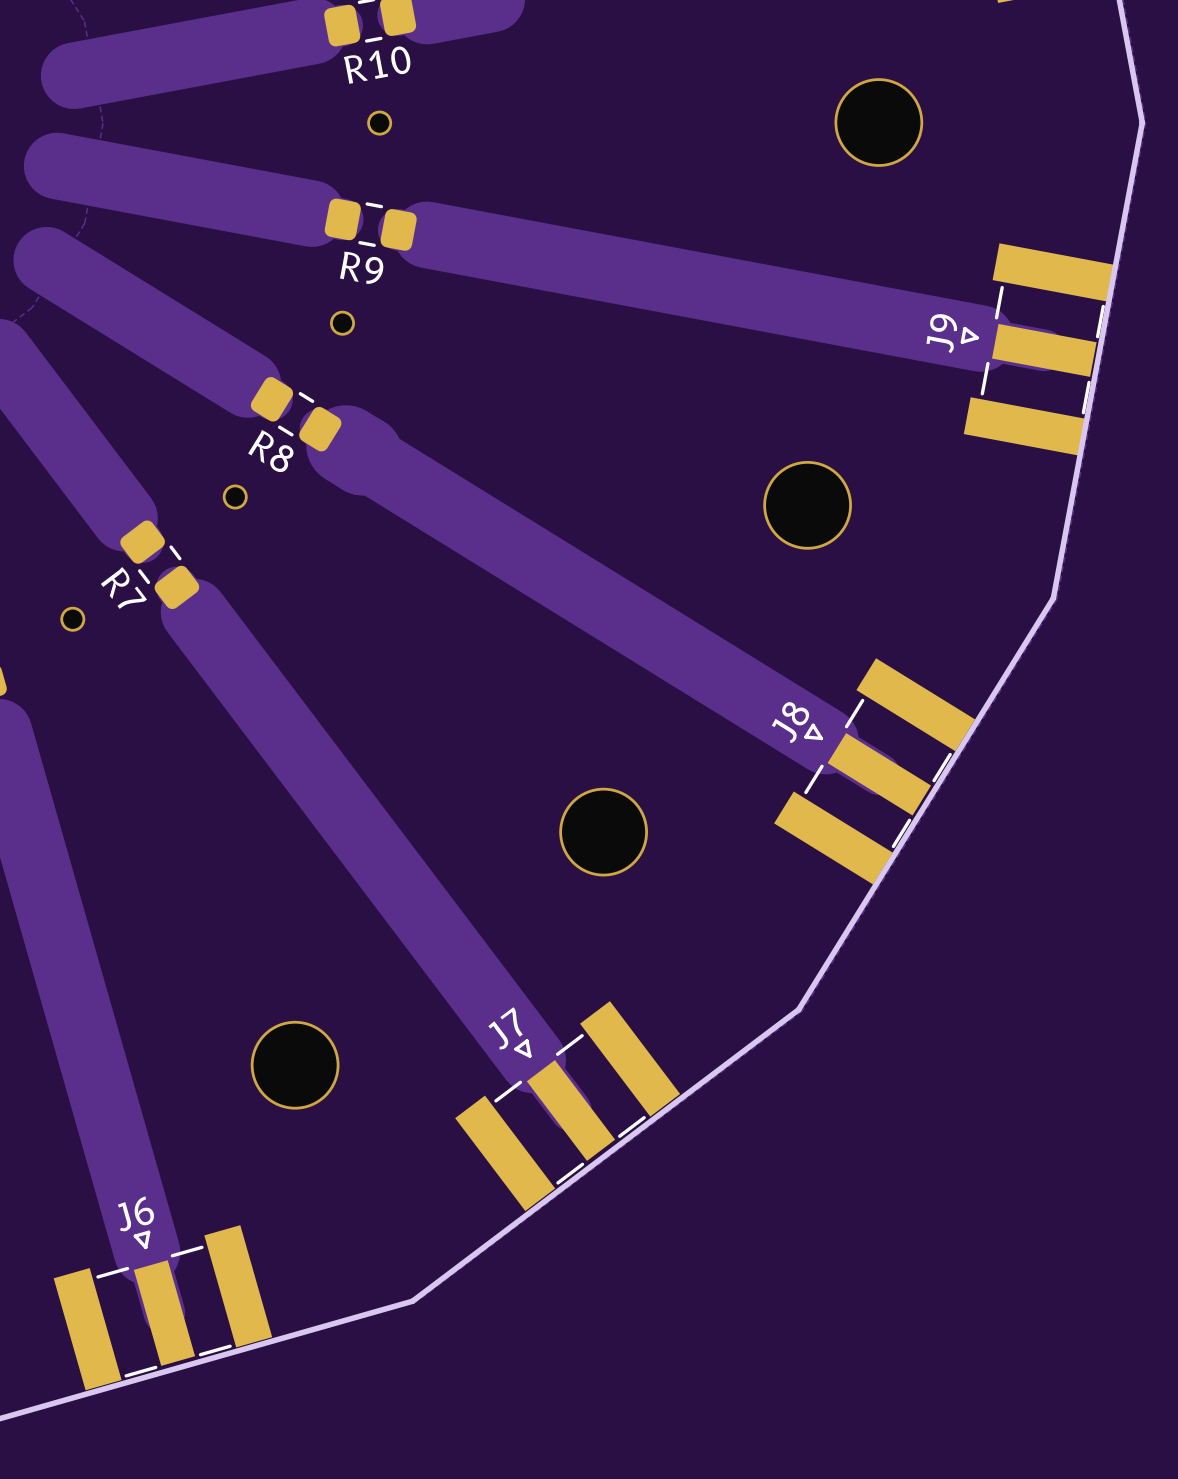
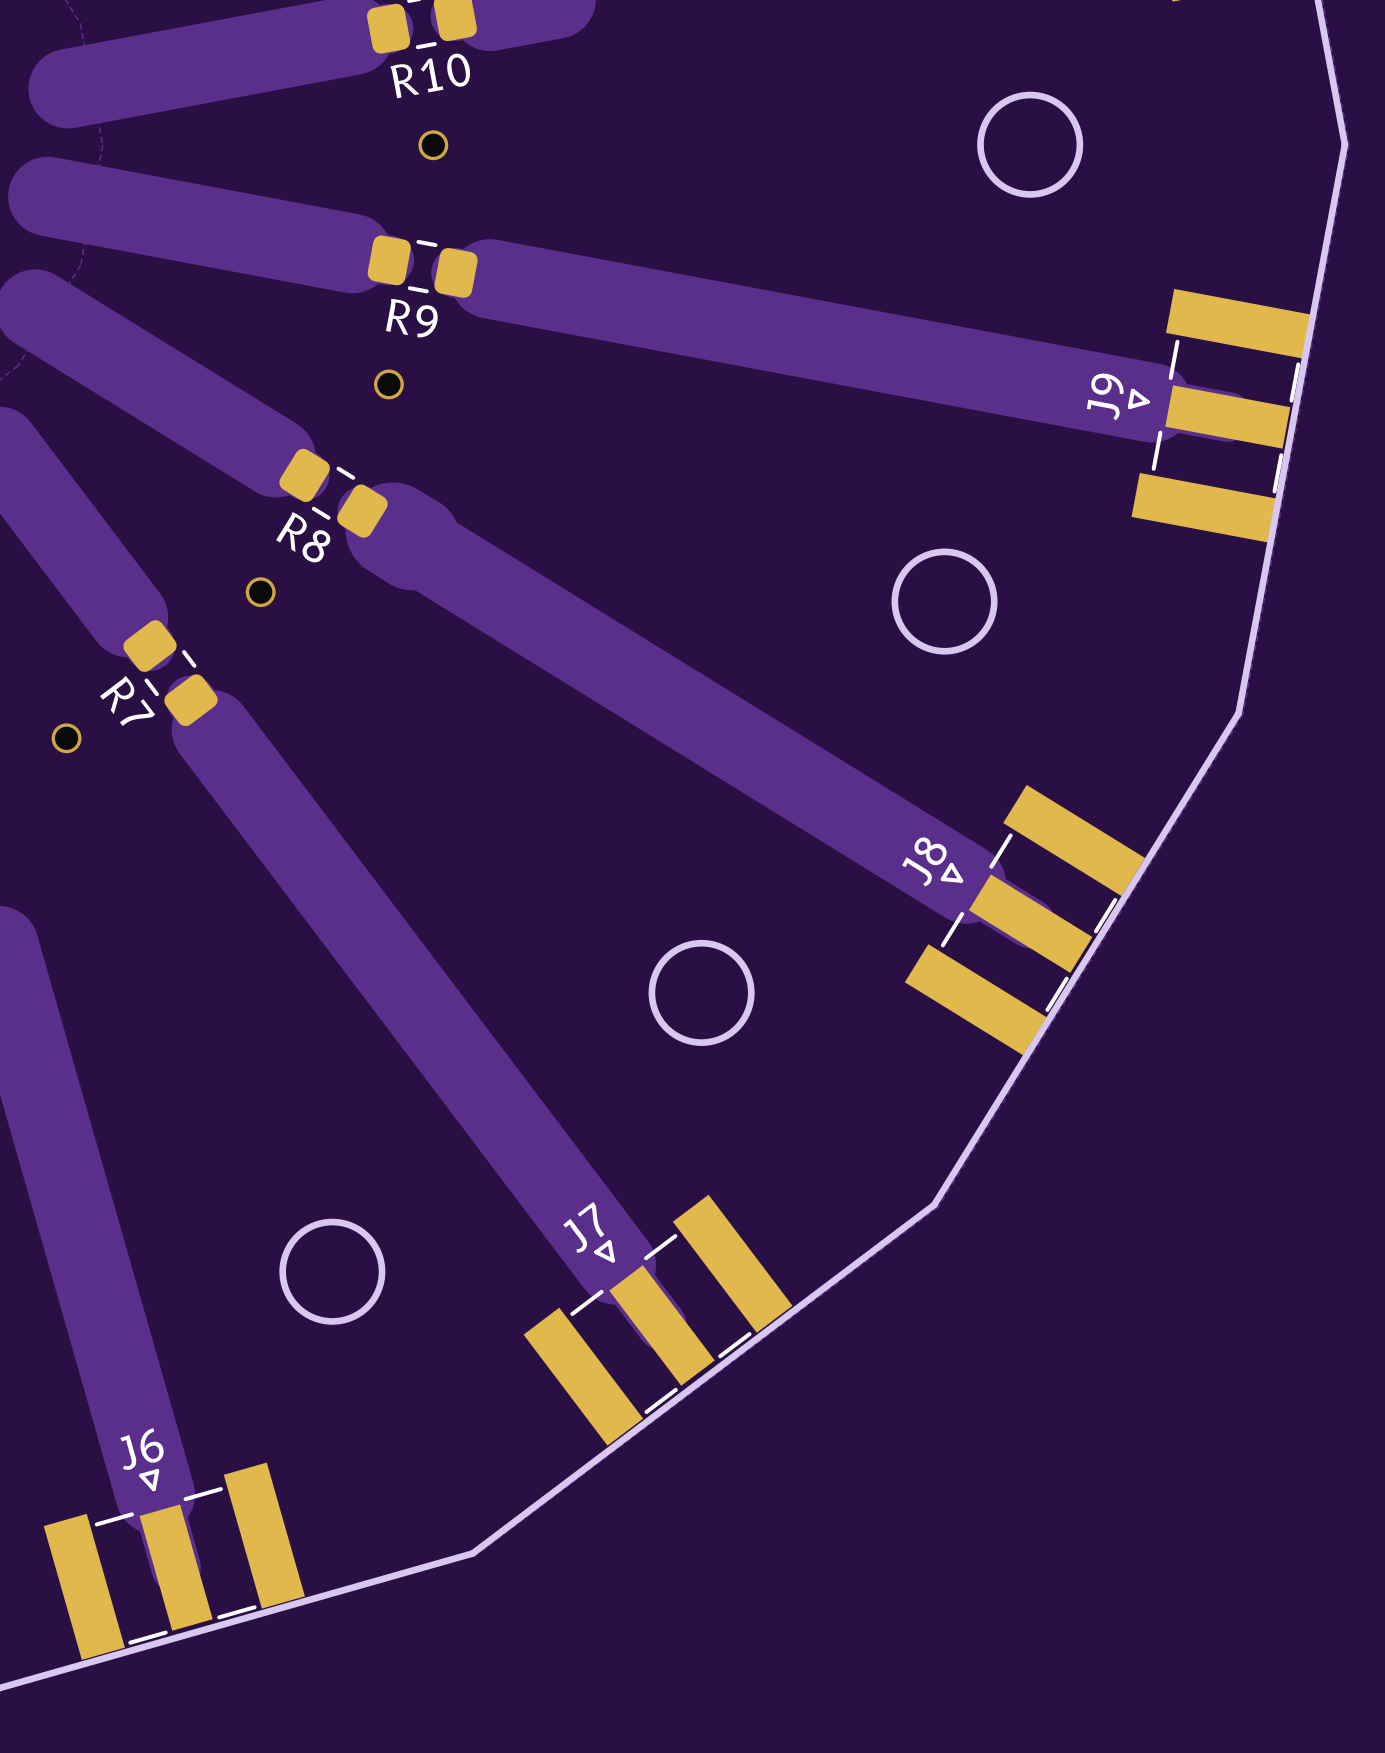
round board edge: none -> [977, 91, 1084, 198]
via: (878, 122) -> none
round board edge: none -> [891, 548, 998, 655]
via: (807, 505) -> none
round board edge: none -> [648, 939, 755, 1046]
via: (603, 832) -> none
round board edge: none -> [279, 1218, 386, 1325]
via: (295, 1065) -> none

